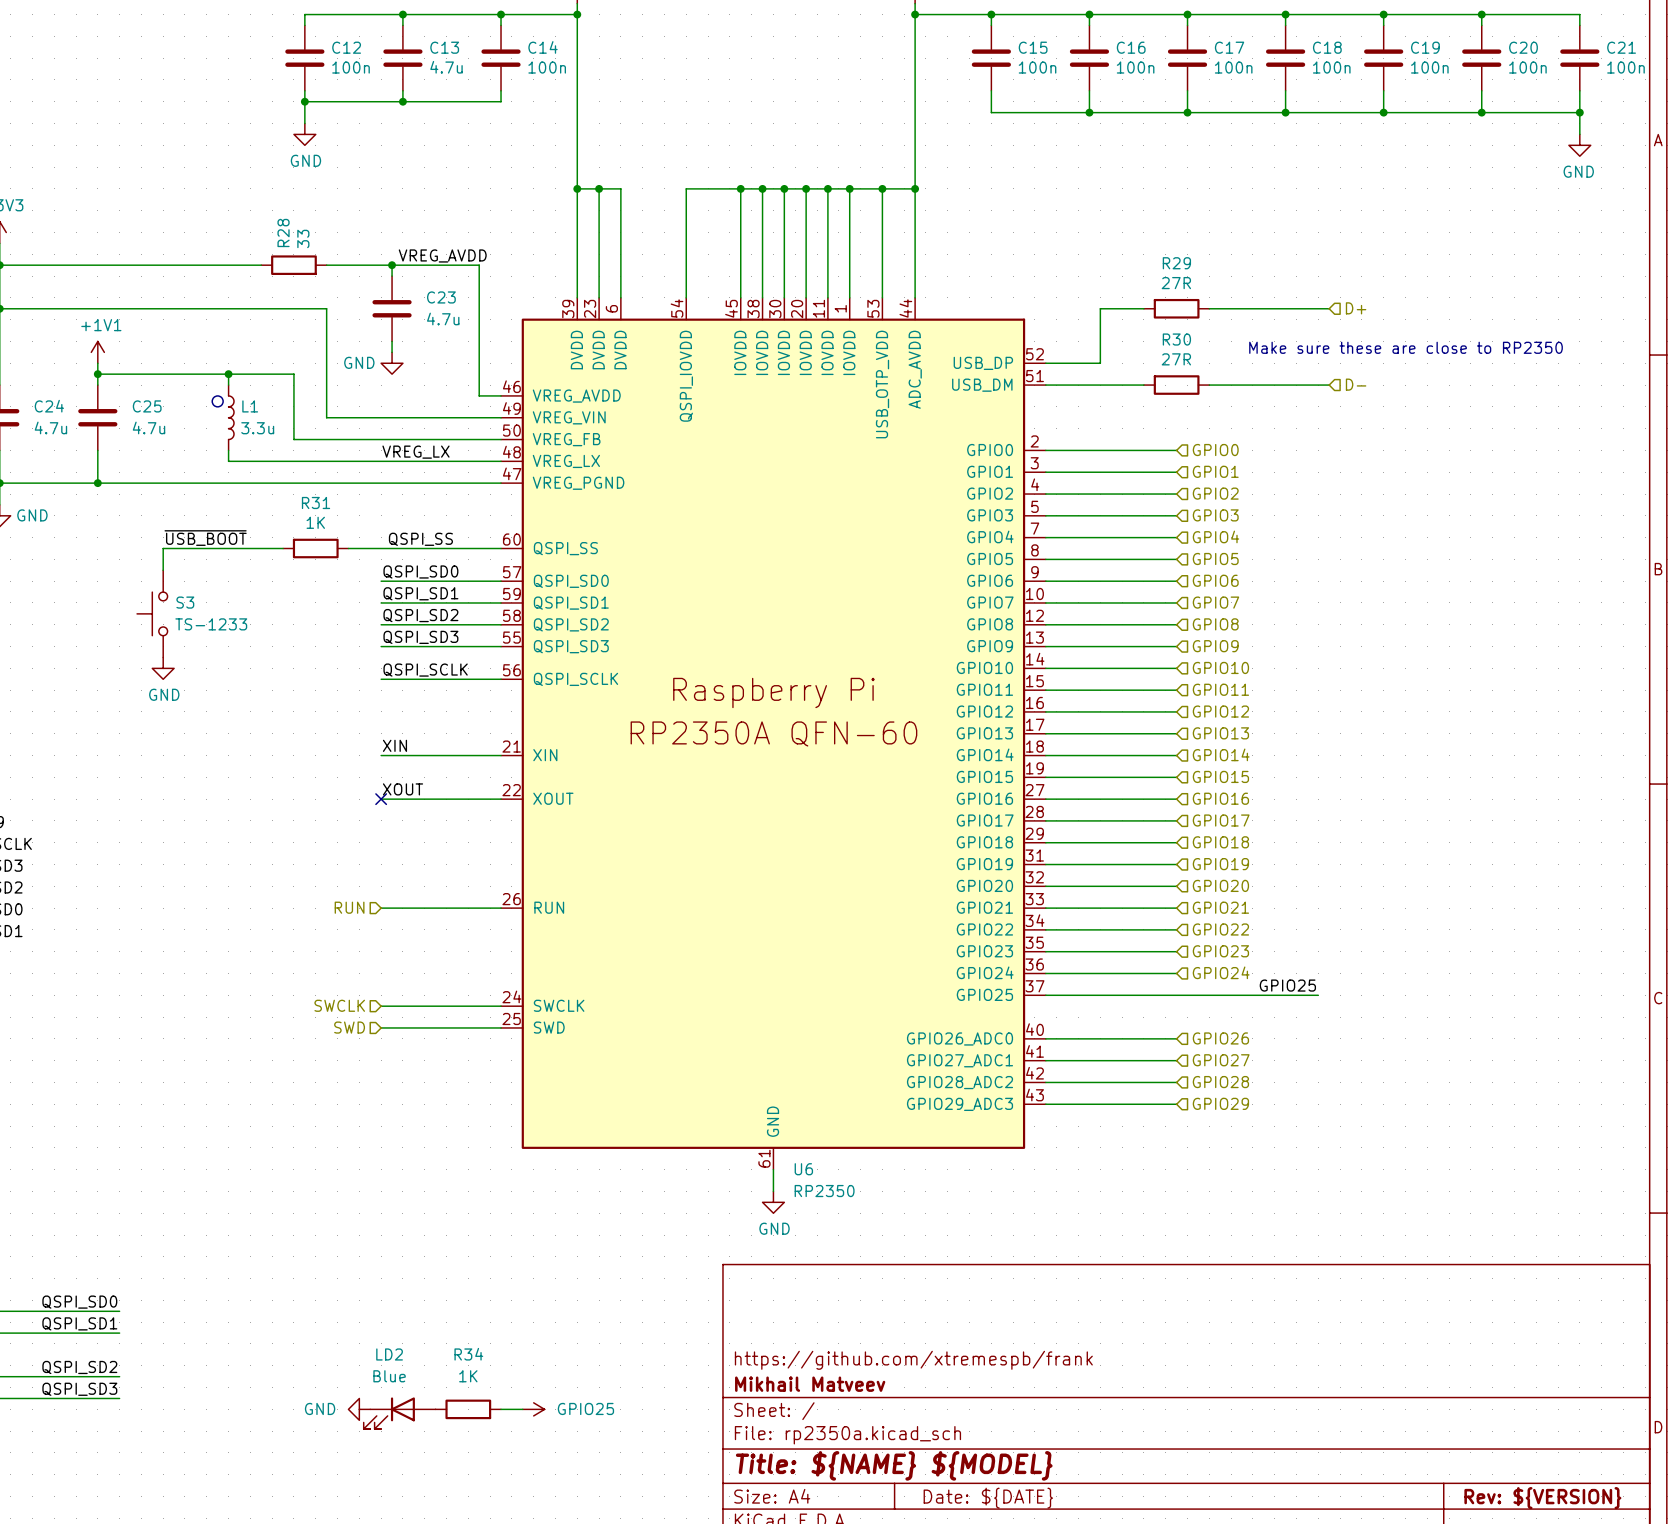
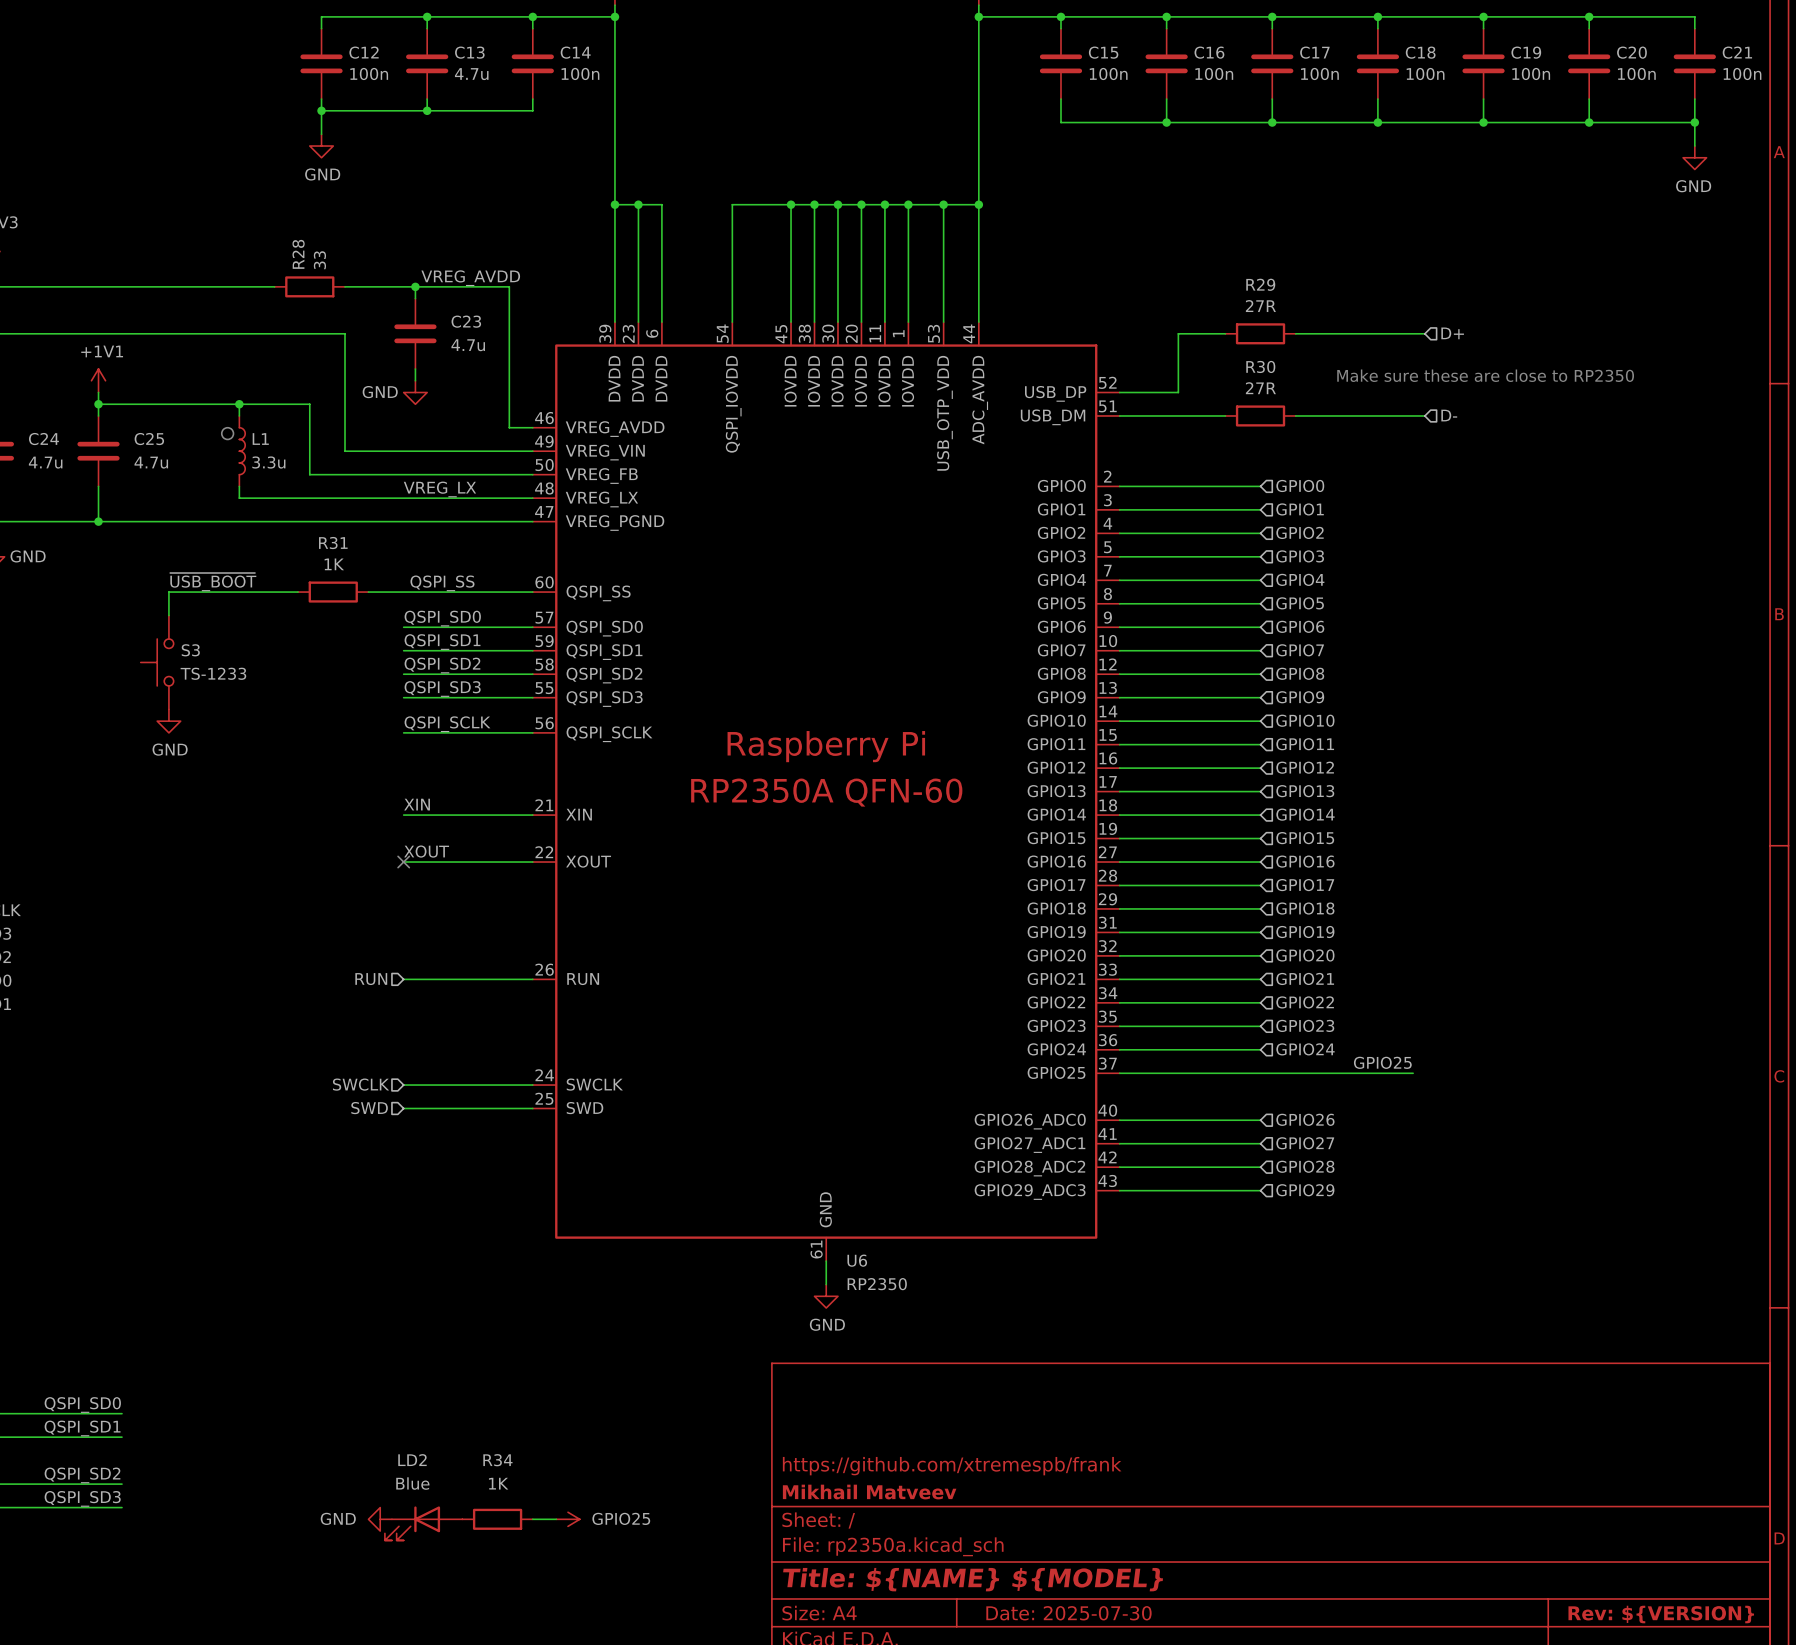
title block: Date: ${DATE} (988, 1498) -> Date: 2025-07-30 (1068, 1613)

